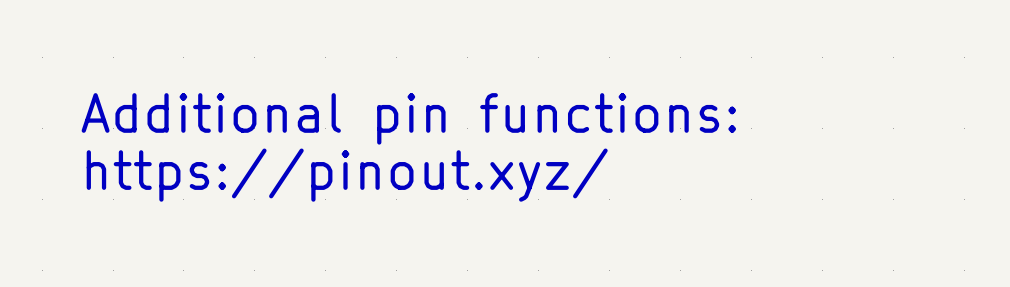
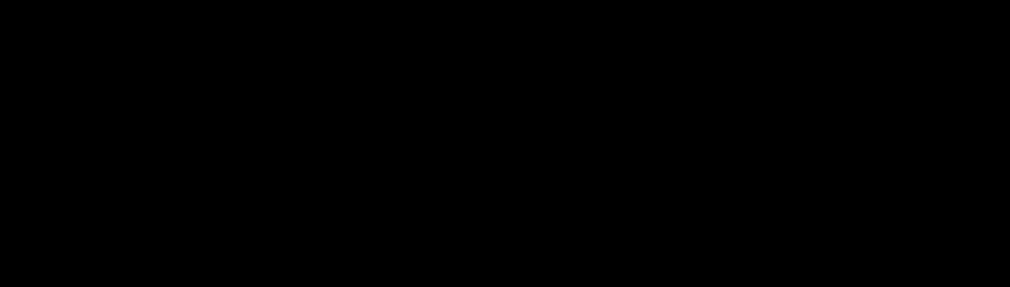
text: Additional pin functions: (408, 118) -> none
text: https://pinout.xyz/ (347, 175) -> none

